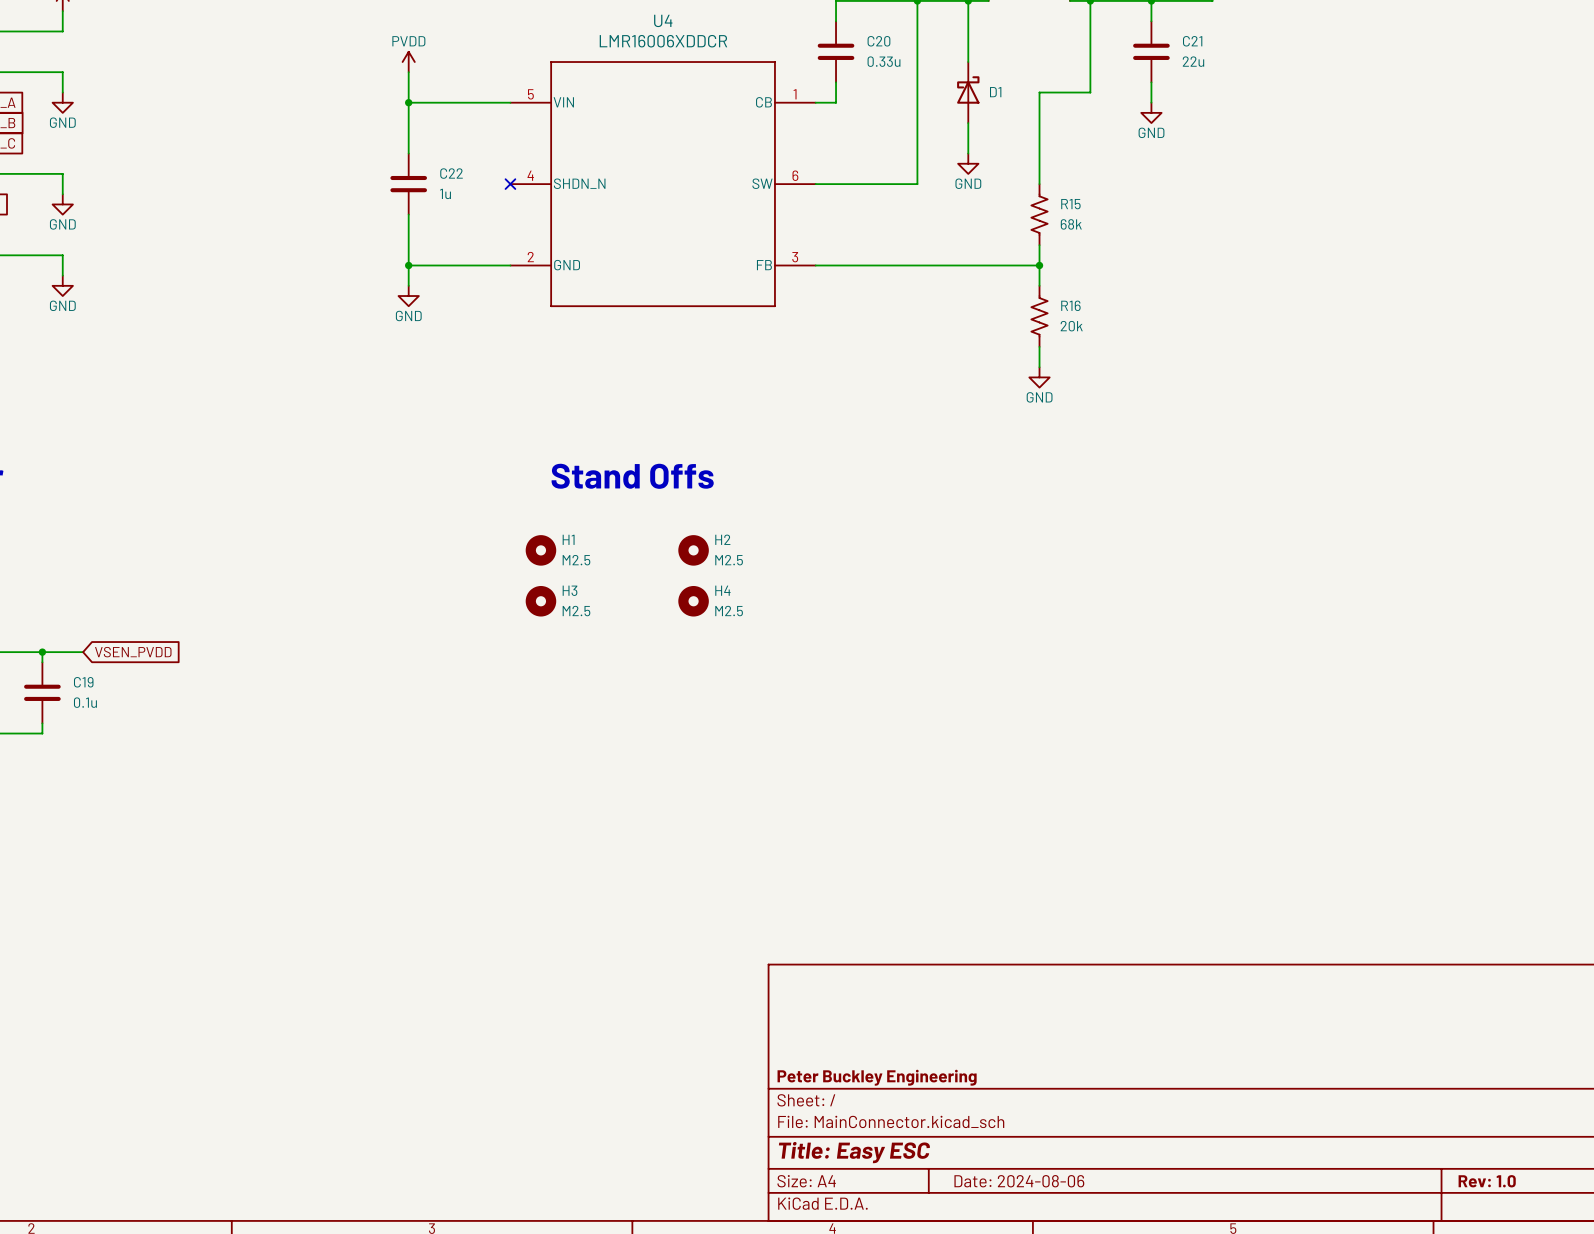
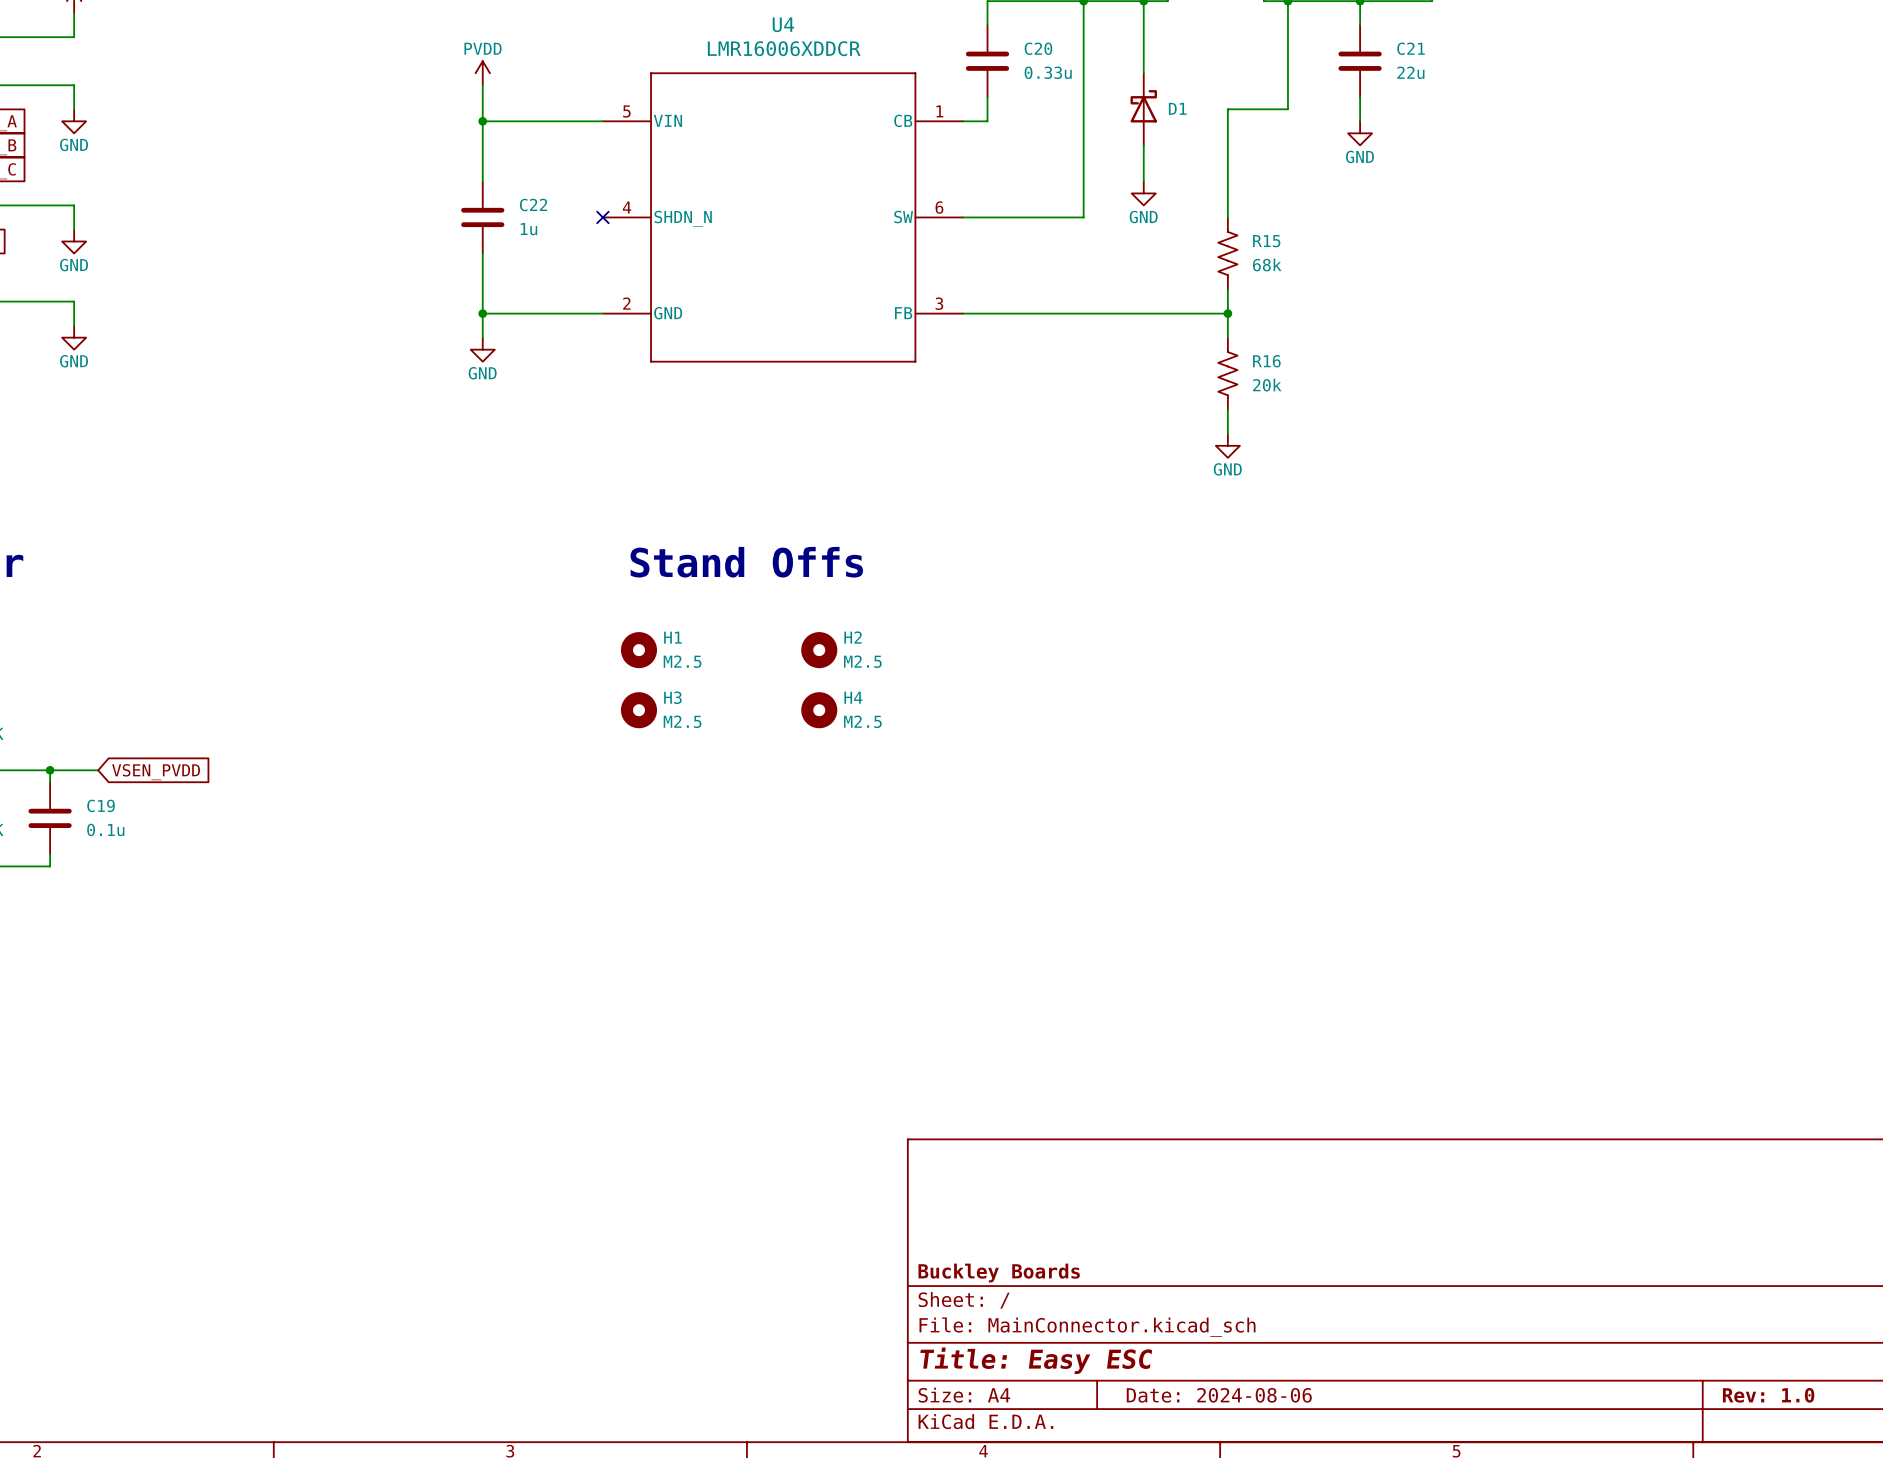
title block: Peter Buckley Engineering (877, 1077) -> Buckley Boards (999, 1273)

